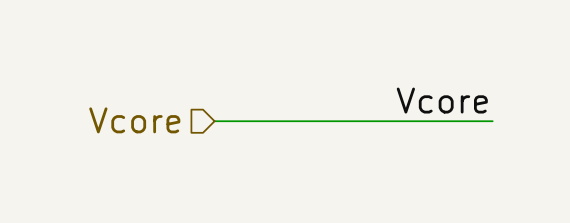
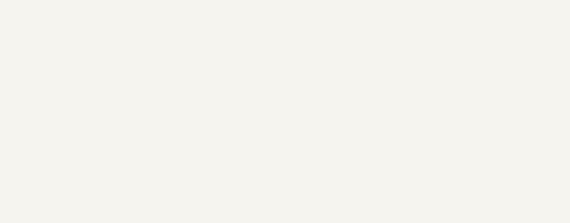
label: Vcore (442, 100) -> none
hierarchical label: Vcore (134, 120) -> none
wire: (214, 121) (492, 121) -> none

